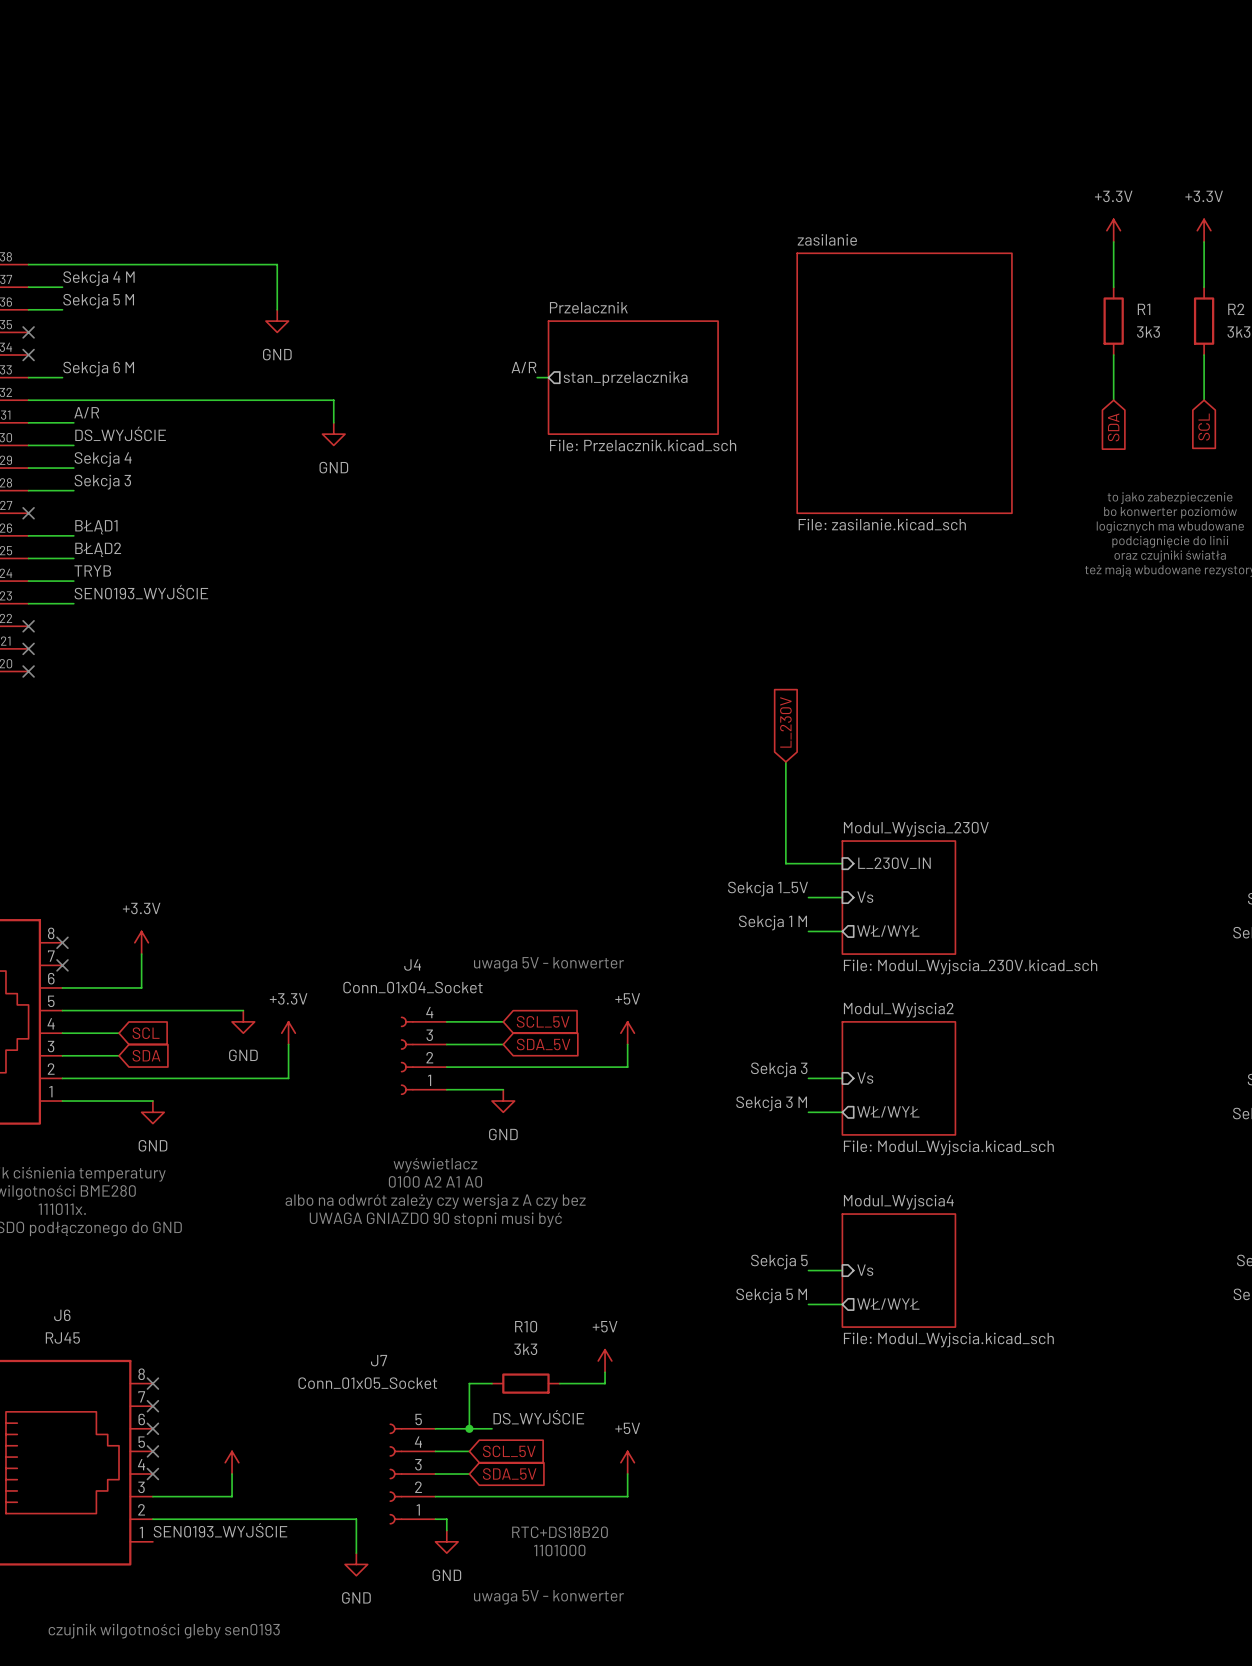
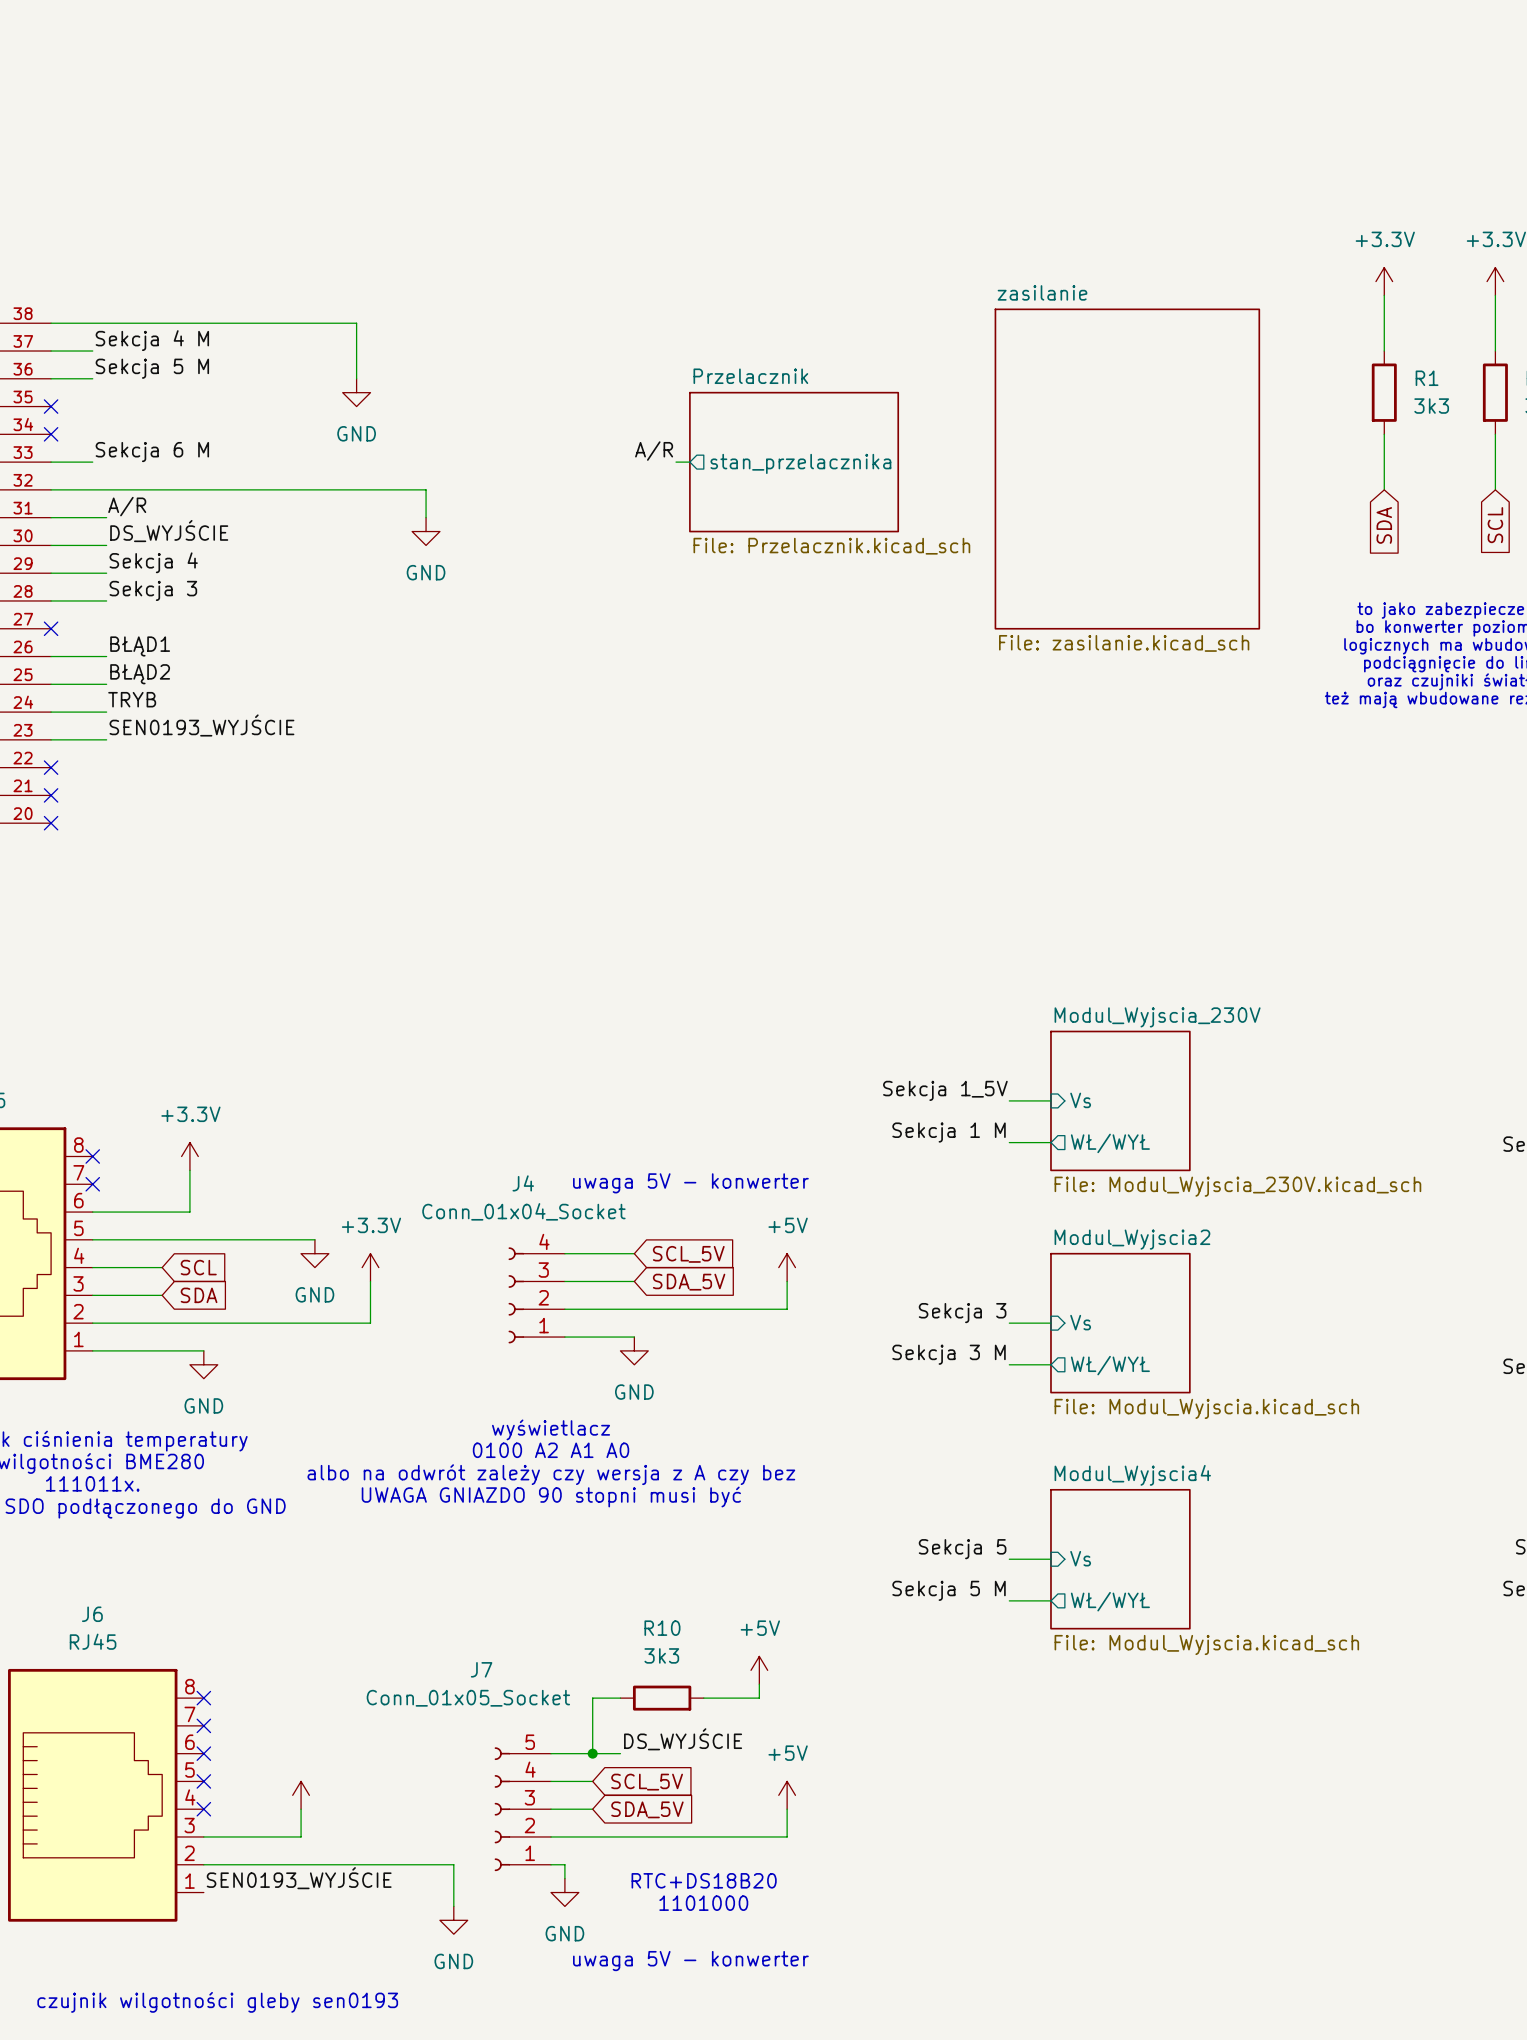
global label: L_230V (785, 722) -> none
wire: (785, 761) (785, 863) (842, 863) -> none
sheet pin: L_230V_IN (894, 863) -> none

